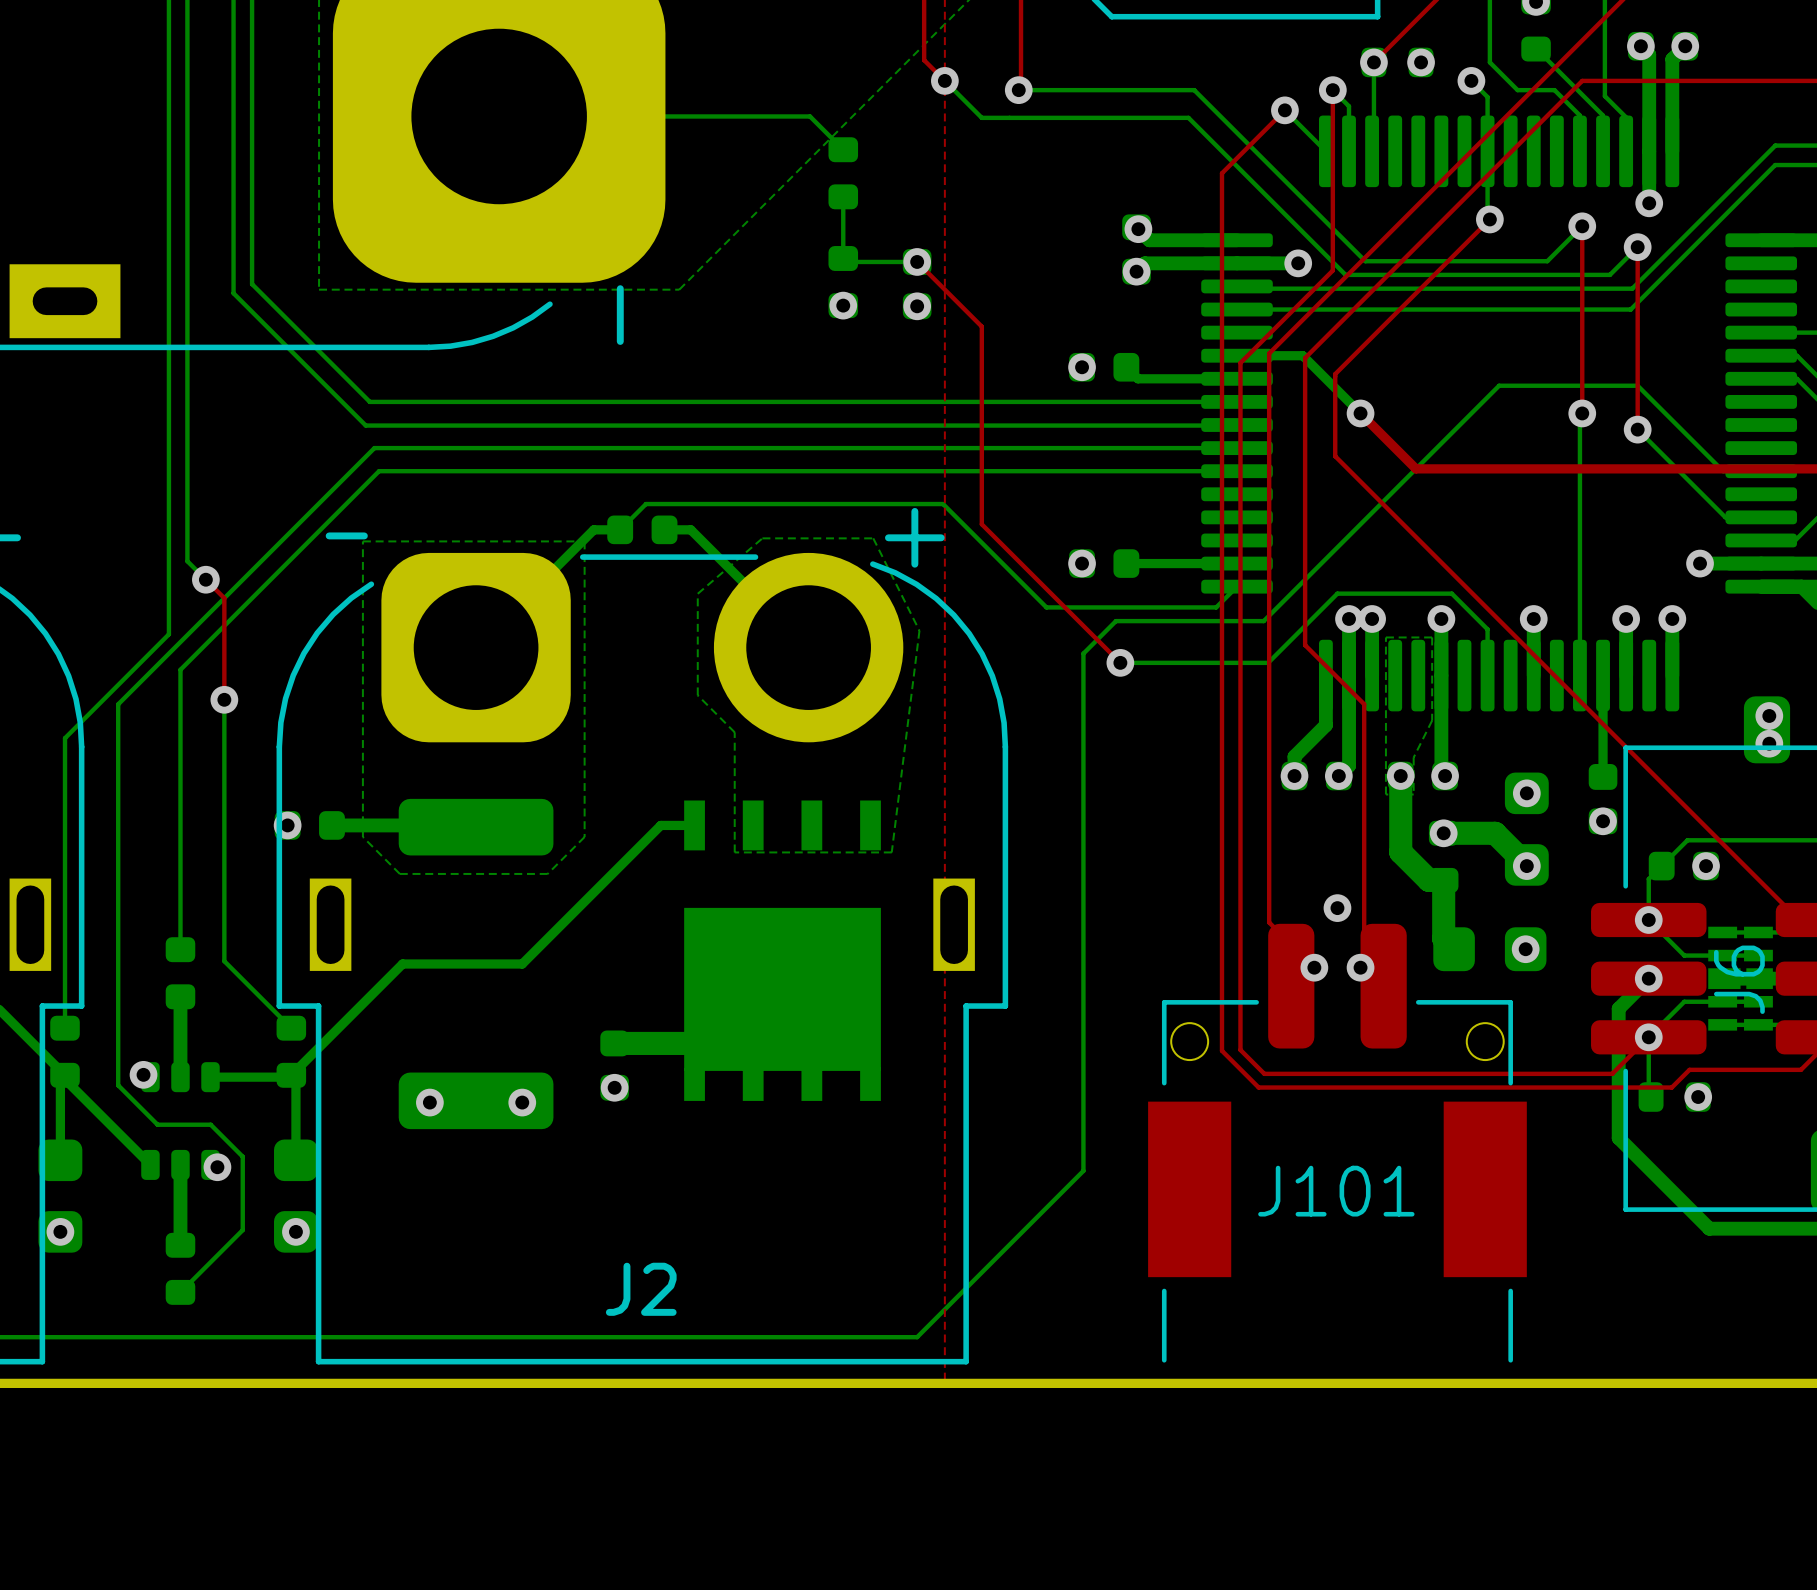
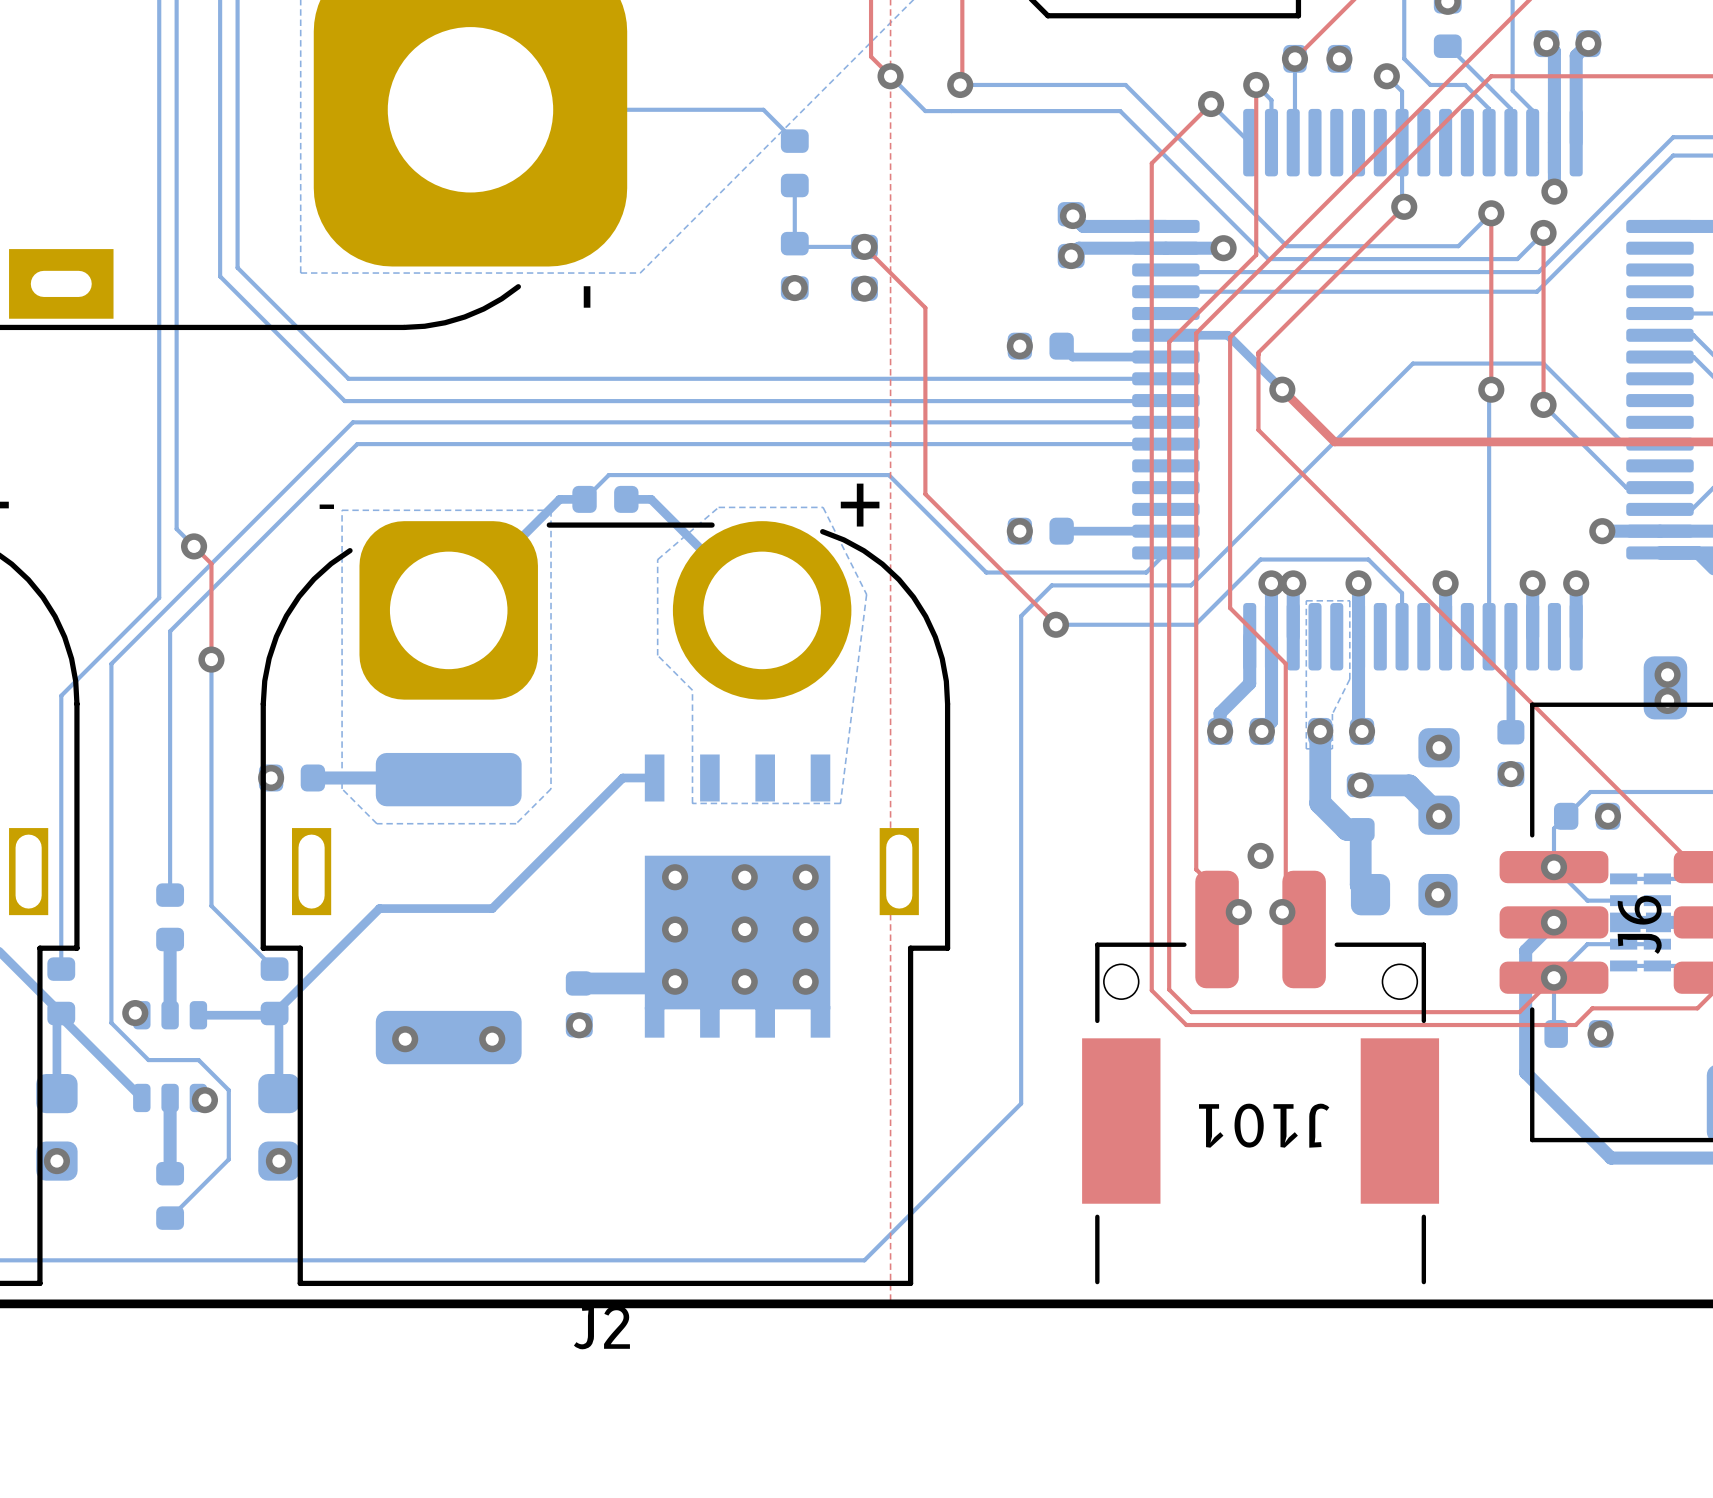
via: none -> (675, 877)
via: none -> (744, 877)
via: none -> (805, 877)
via: none -> (675, 929)
via: none -> (744, 929)
via: none -> (805, 929)
via: none -> (675, 981)
via: none -> (744, 981)
via: none -> (805, 981)
J101 name rotation: 0° (1336, 1191) -> 180° (1264, 1125)
J2 name position: J2 (641, 1289) -> J2 (601, 1327)

